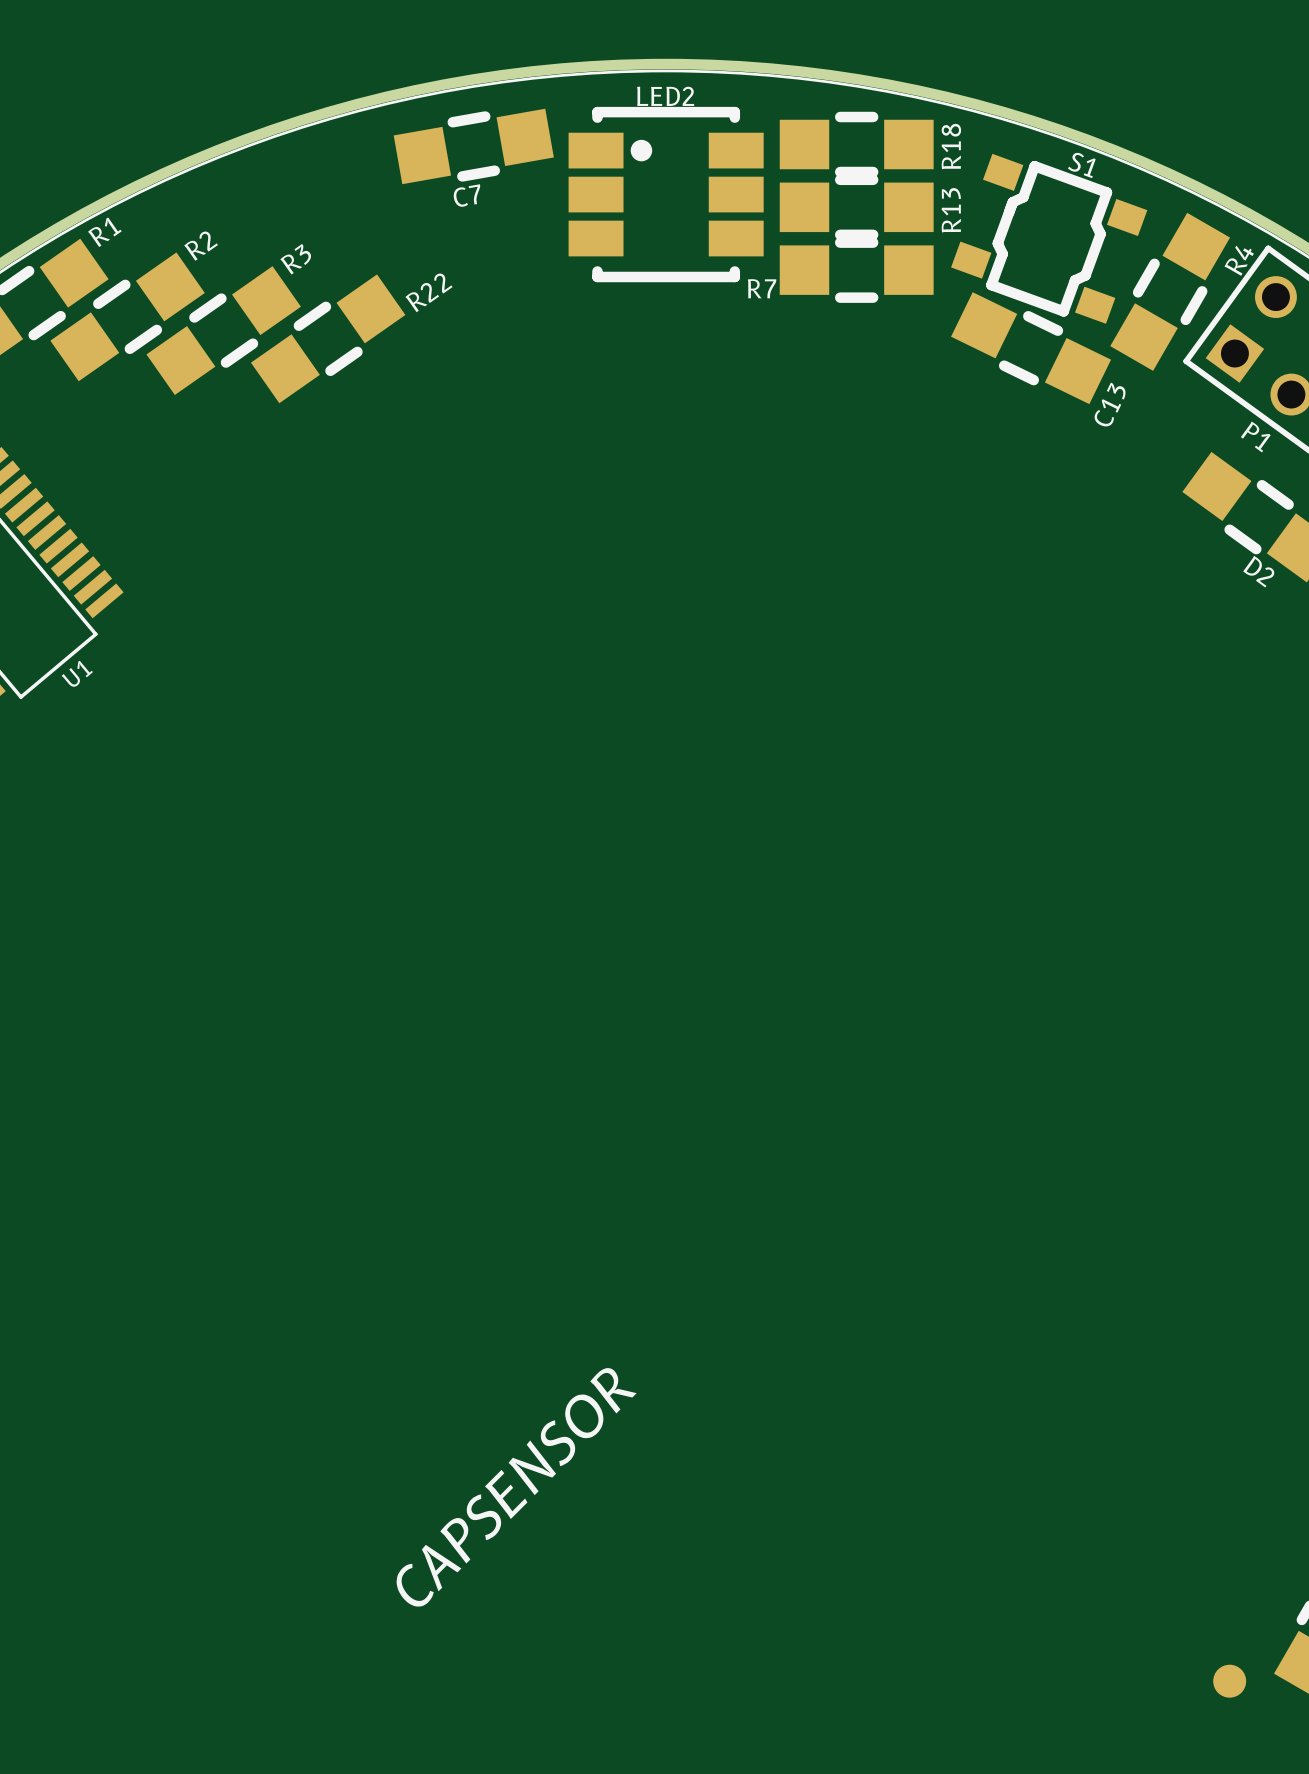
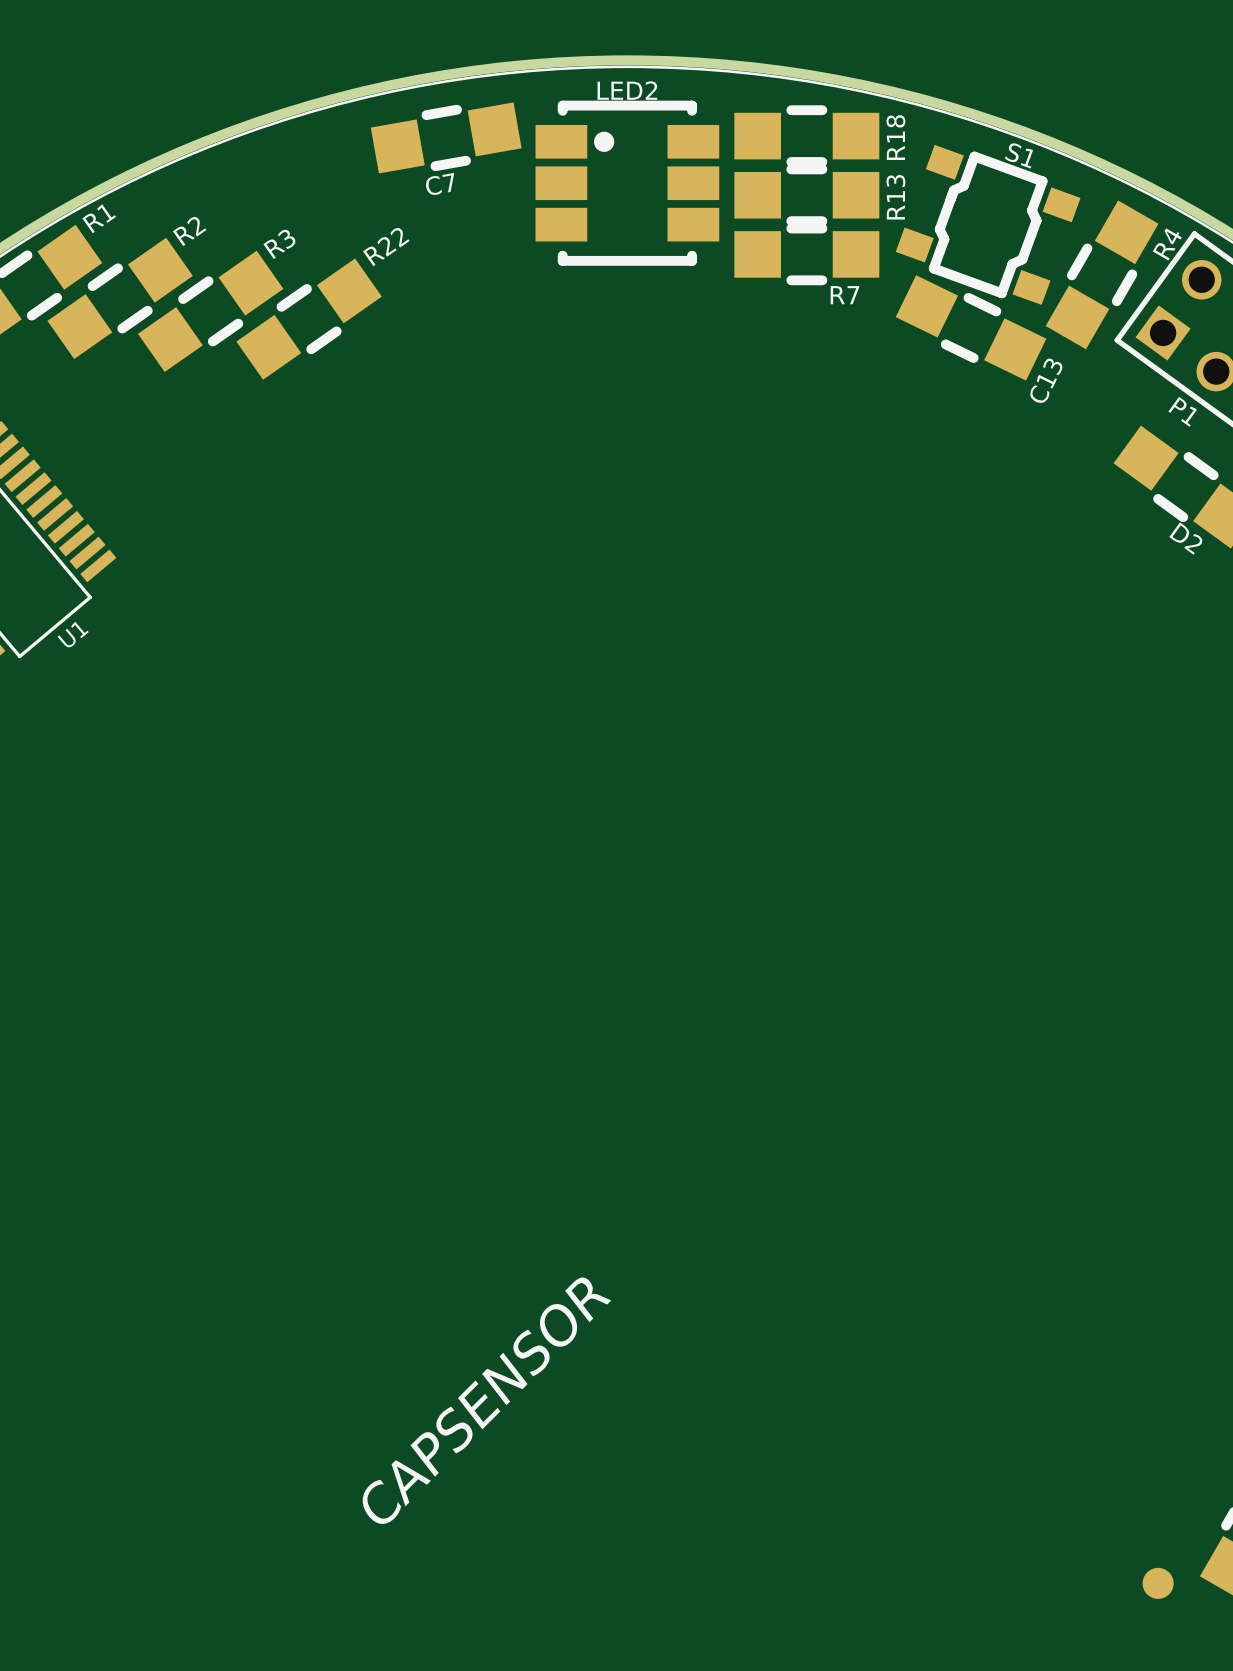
R7 name position: R7 (762, 288) -> R7 (844, 295)
R22 name position: R22 (429, 292) -> R22 (386, 247)

